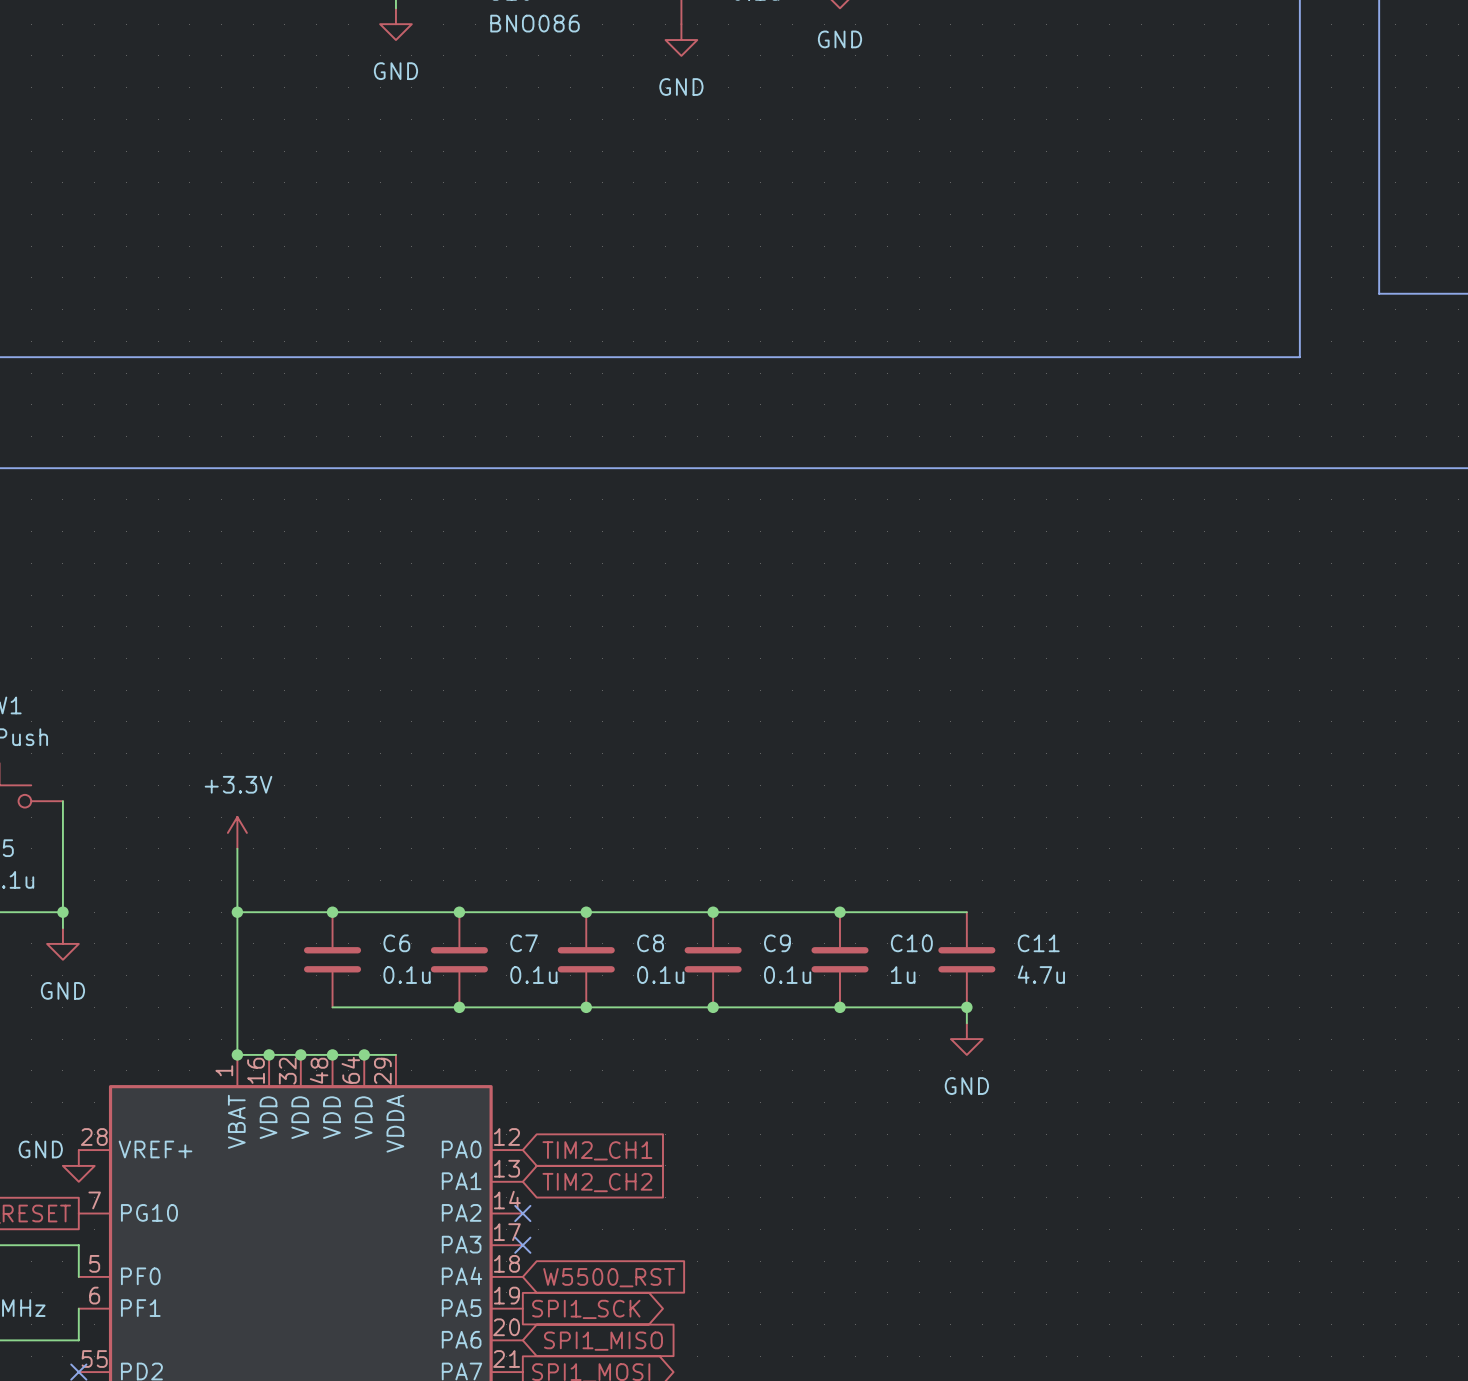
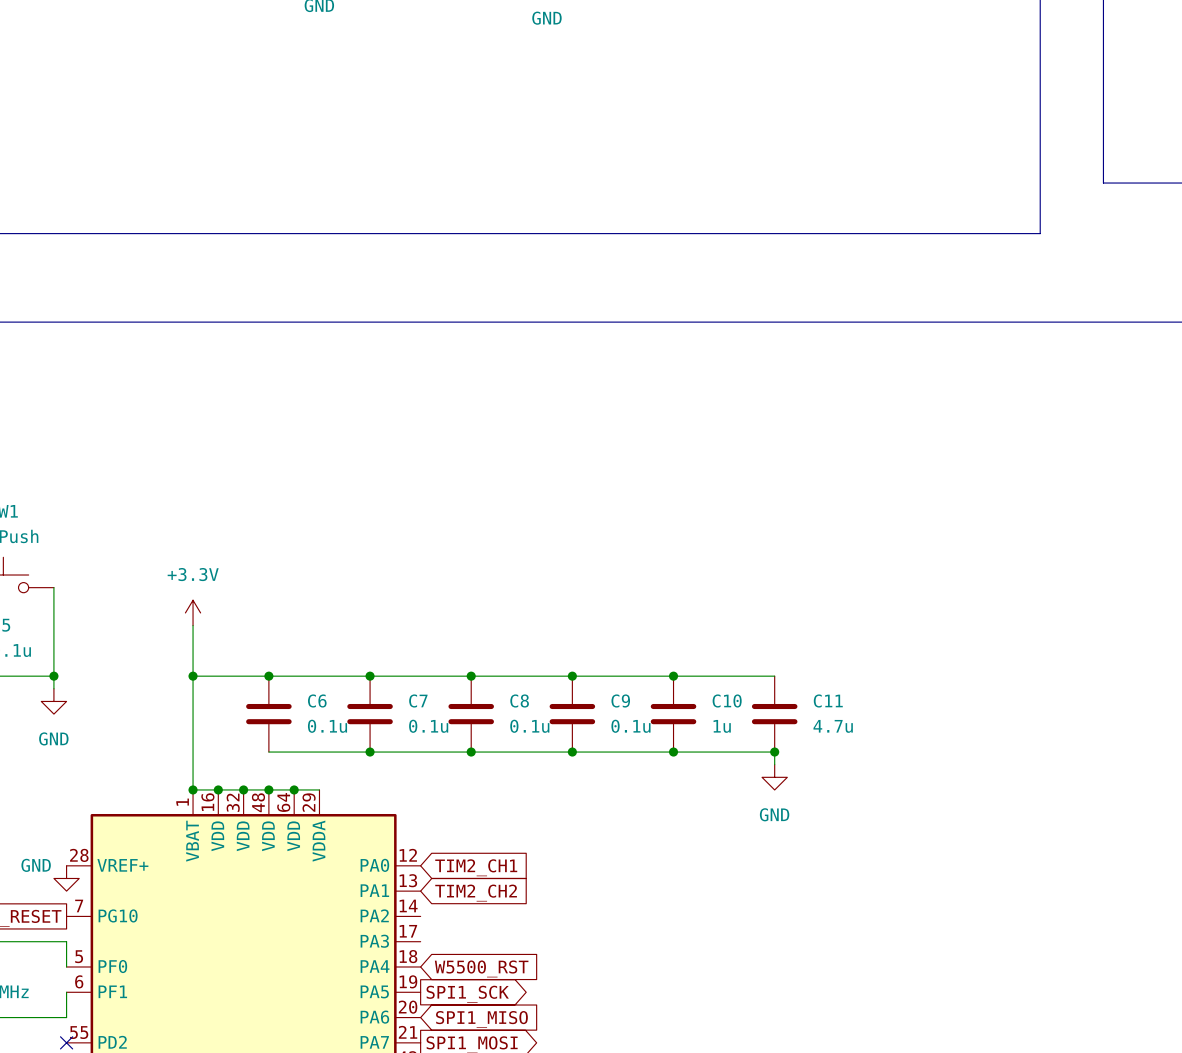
no-connect mark: (522, 1213) -> none
no-connect mark: (522, 1245) -> none

